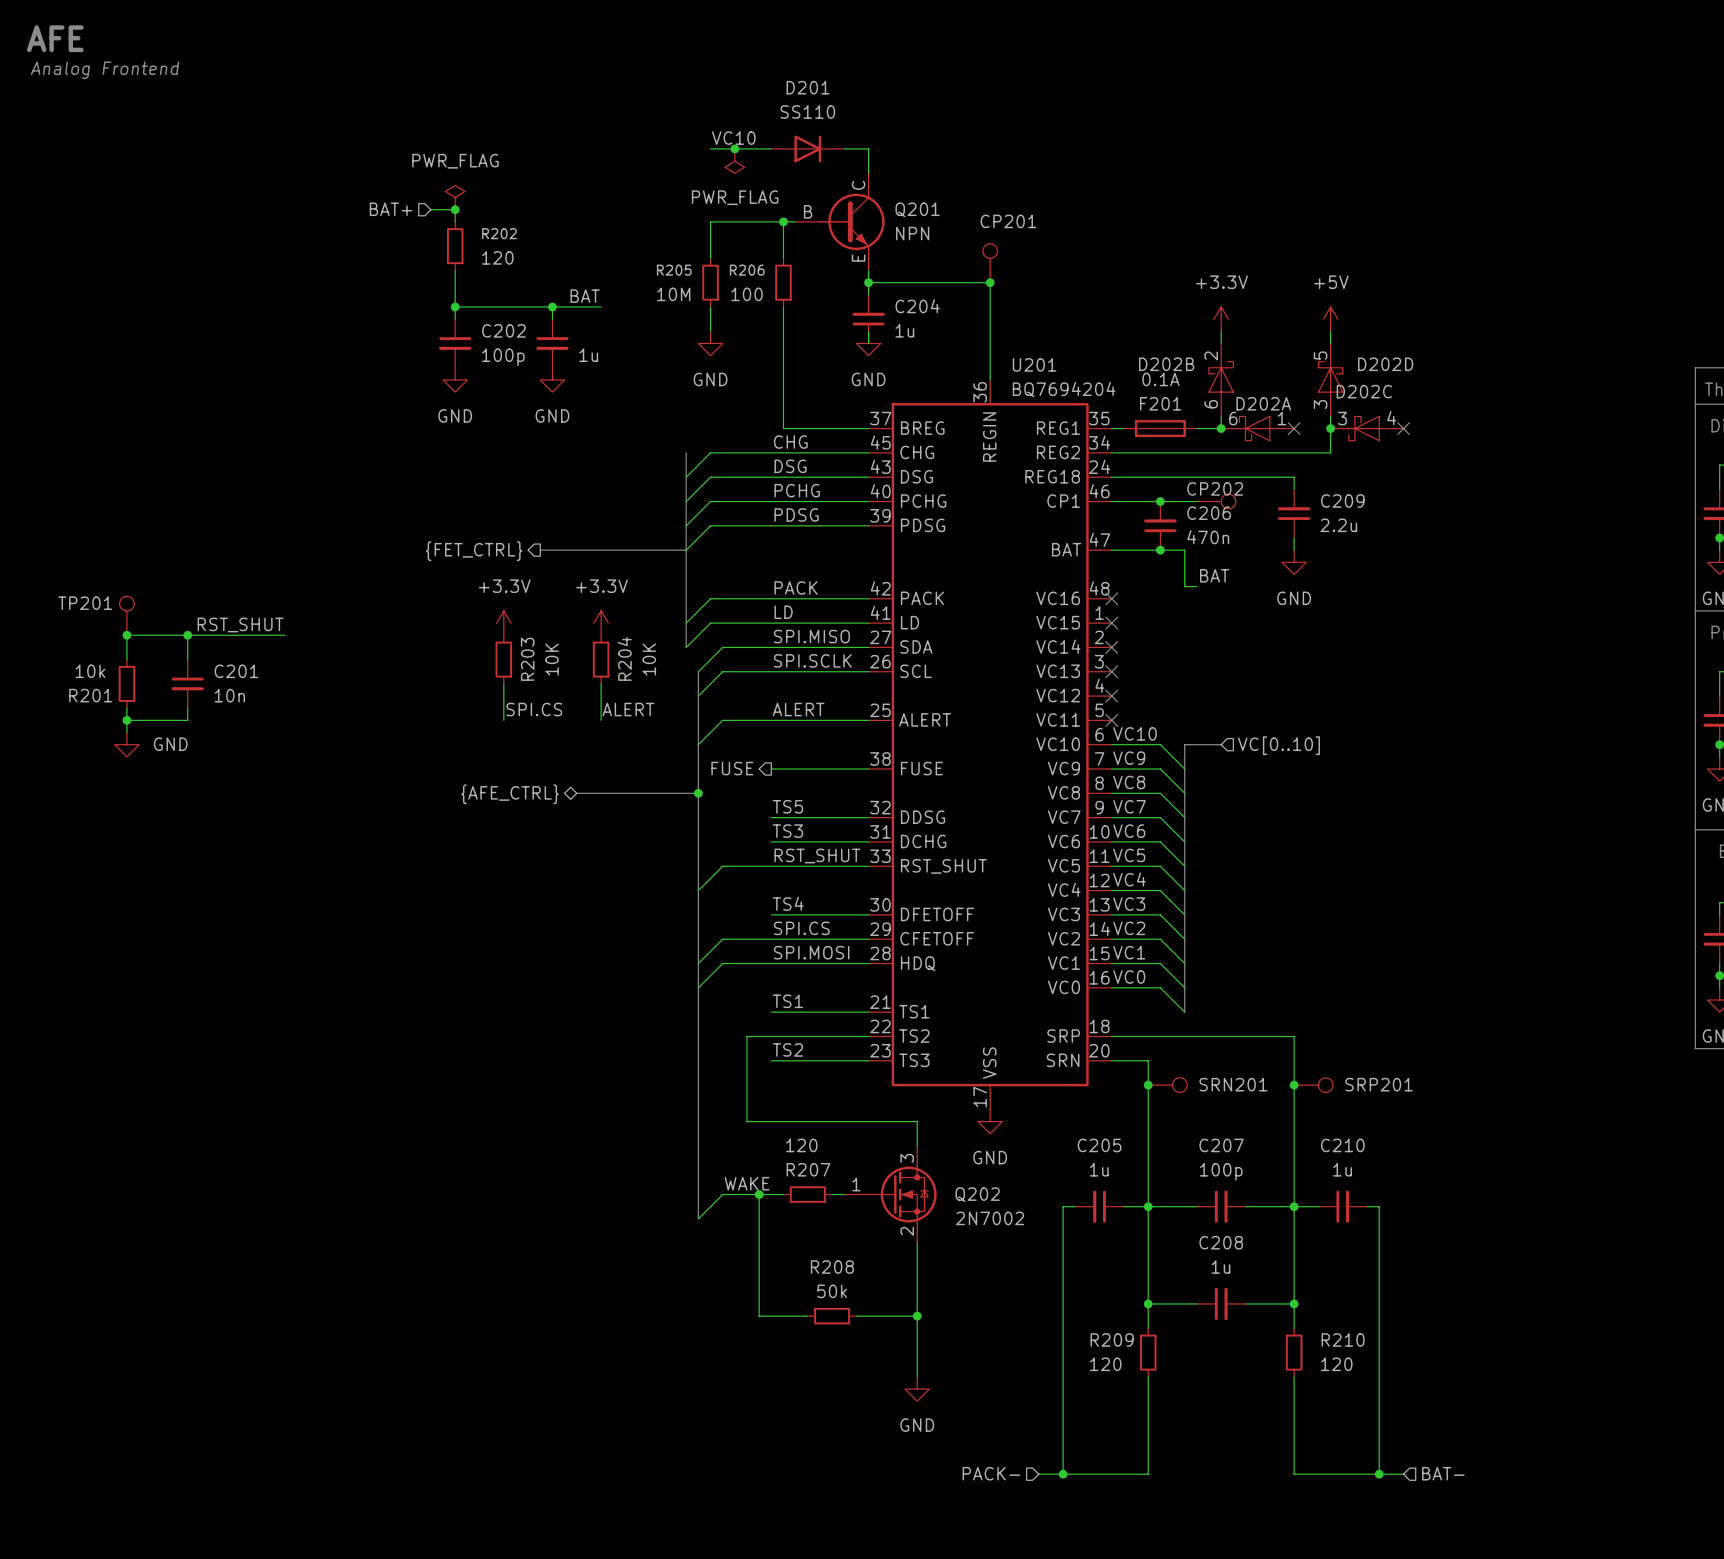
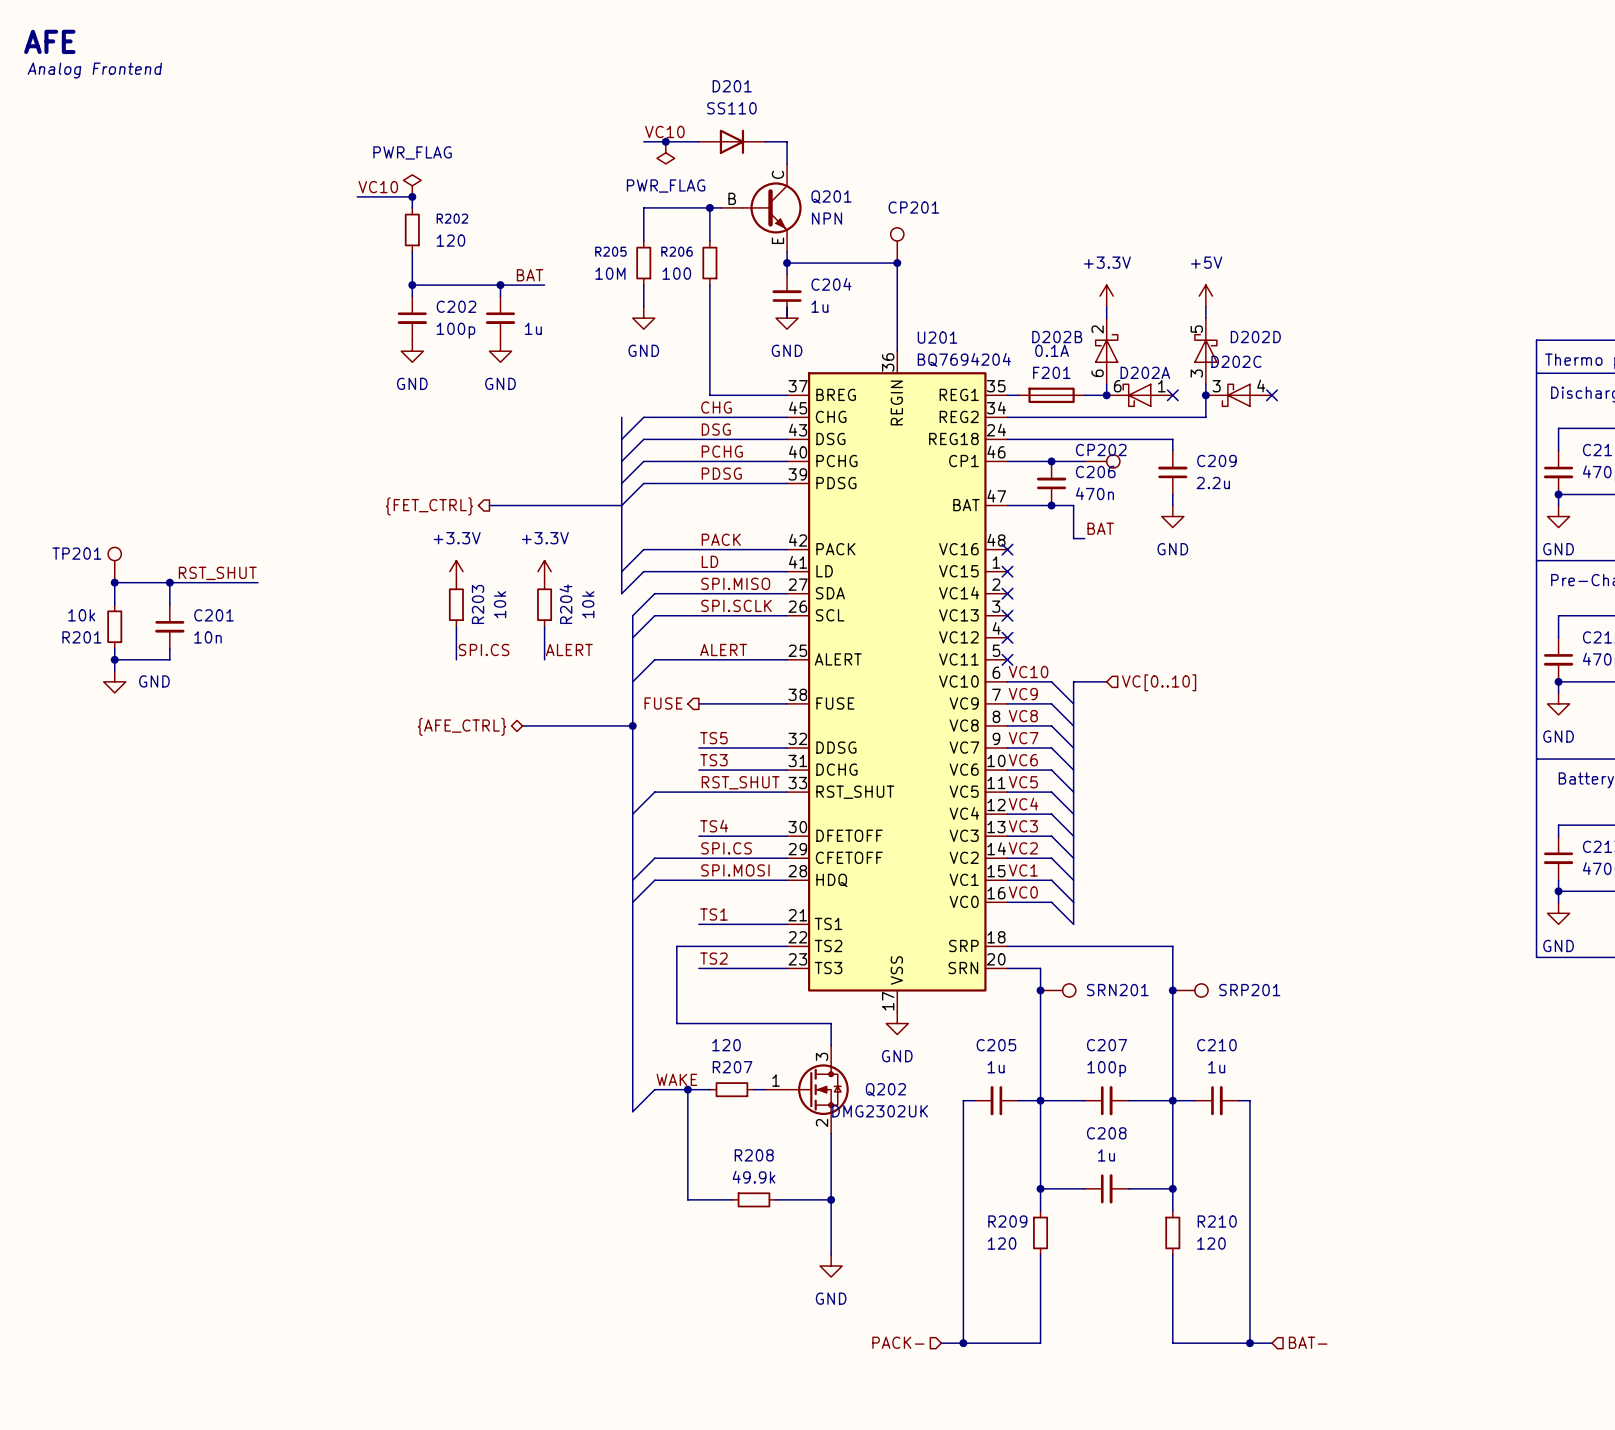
label: none -> VC10 (378, 187)
hierarchical label: BAT+ (391, 209) -> none
wire: none -> (357, 196) (390, 196)
R203 value: 10K (552, 659) -> 10k (500, 604)
R204 value: 10K (649, 659) -> 10k (588, 604)
Q202 value: 2N7002 (990, 1218) -> DMG2302UK (880, 1111)
R208 value: 50k (832, 1291) -> 49.9k (753, 1177)

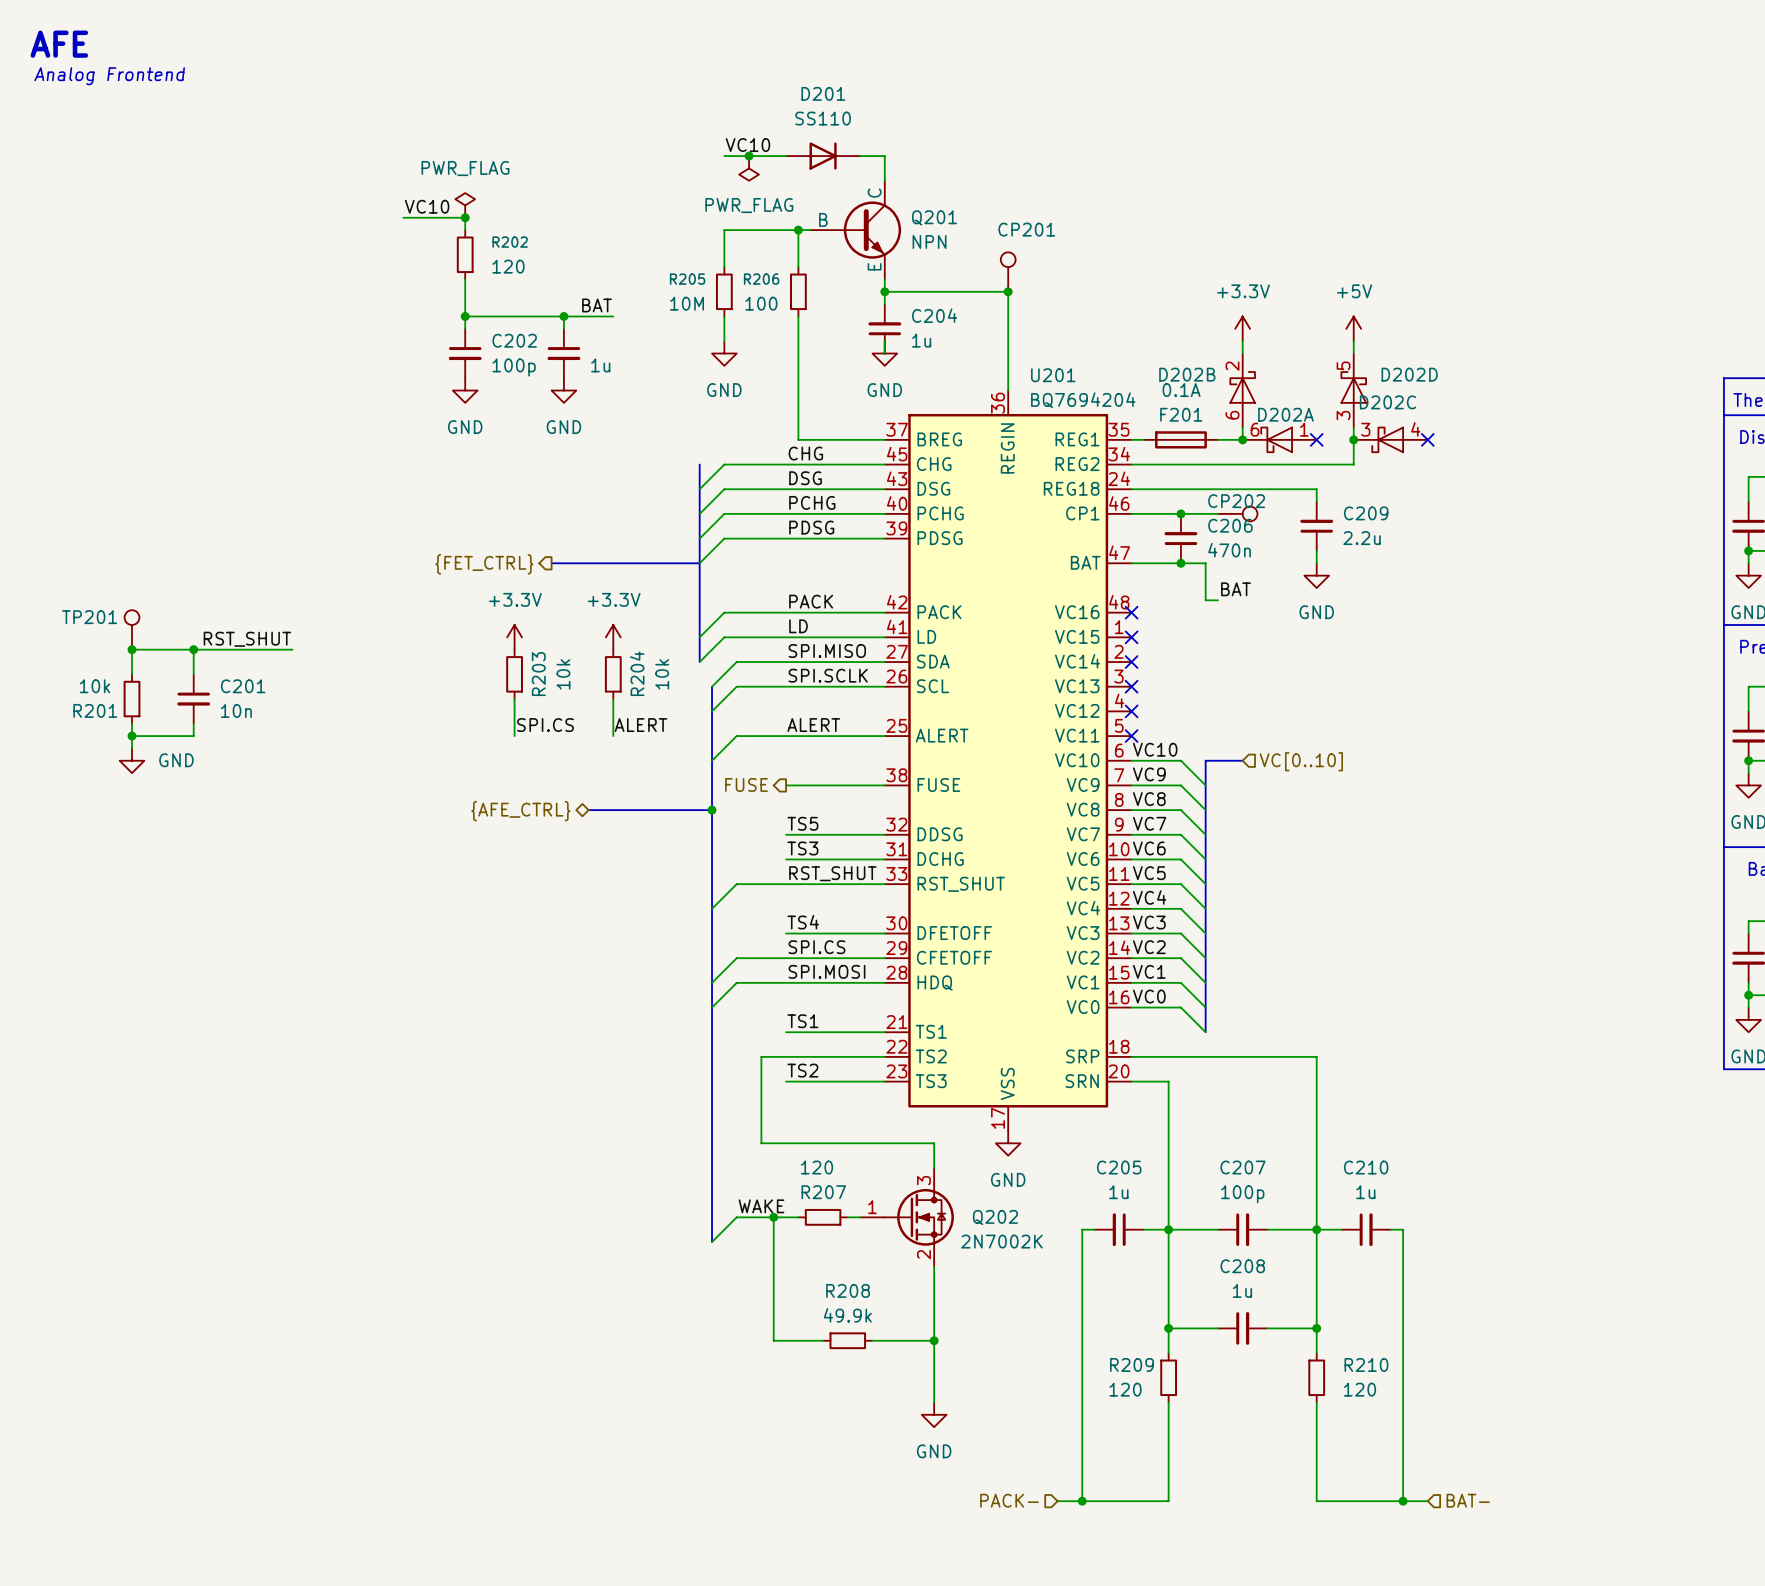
junction: (1040, 990) -> none
SRN201: (1058, 990) -> none
junction: (1172, 990) -> none
SRP201: (1190, 990) -> none
Q202 value: DMG2302UK (880, 1111) -> 2N7002K (1001, 1241)

